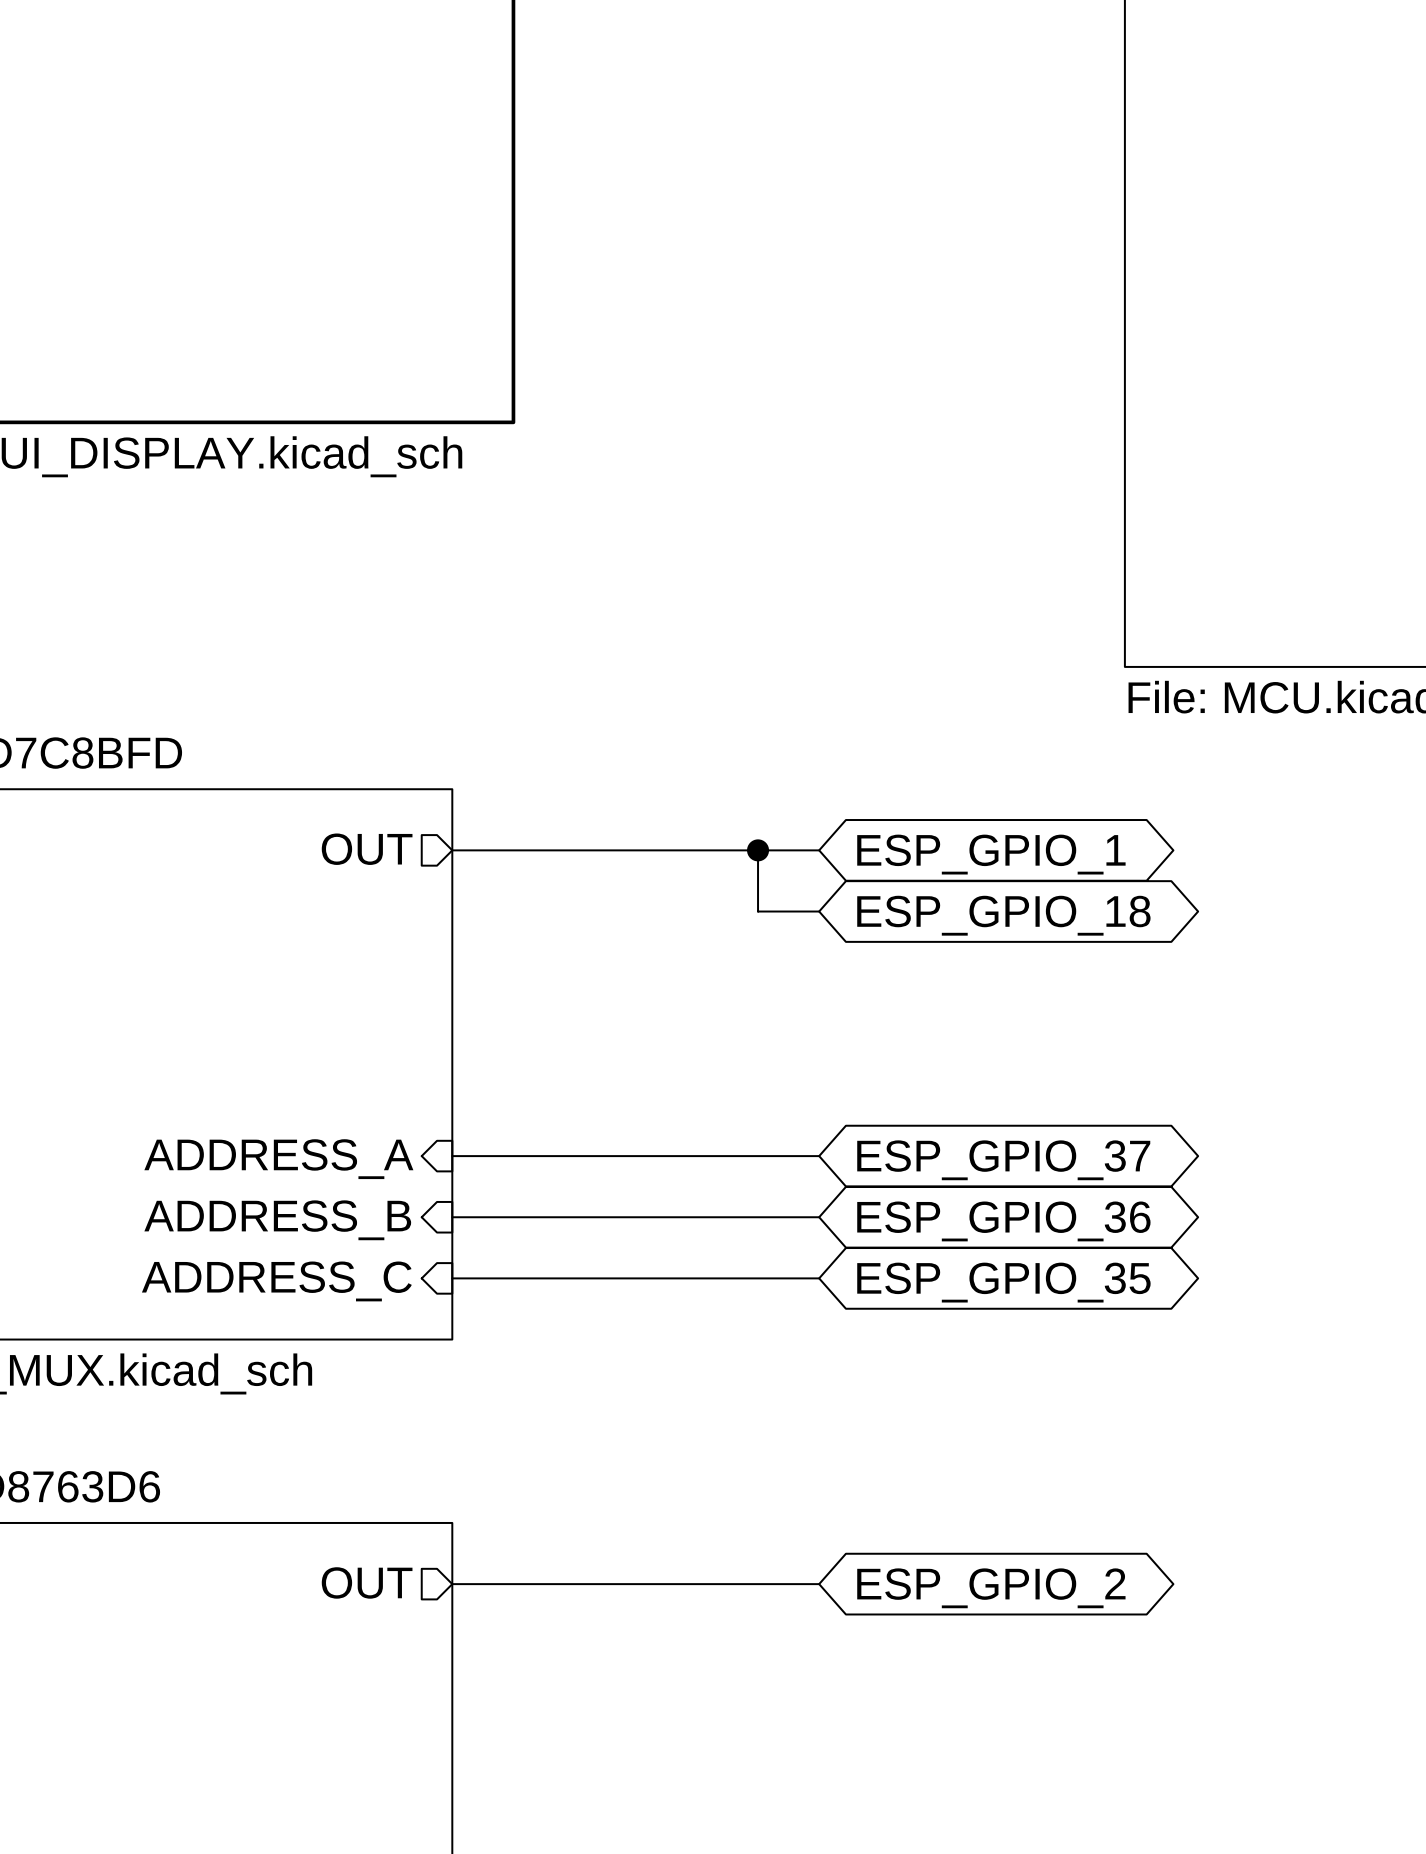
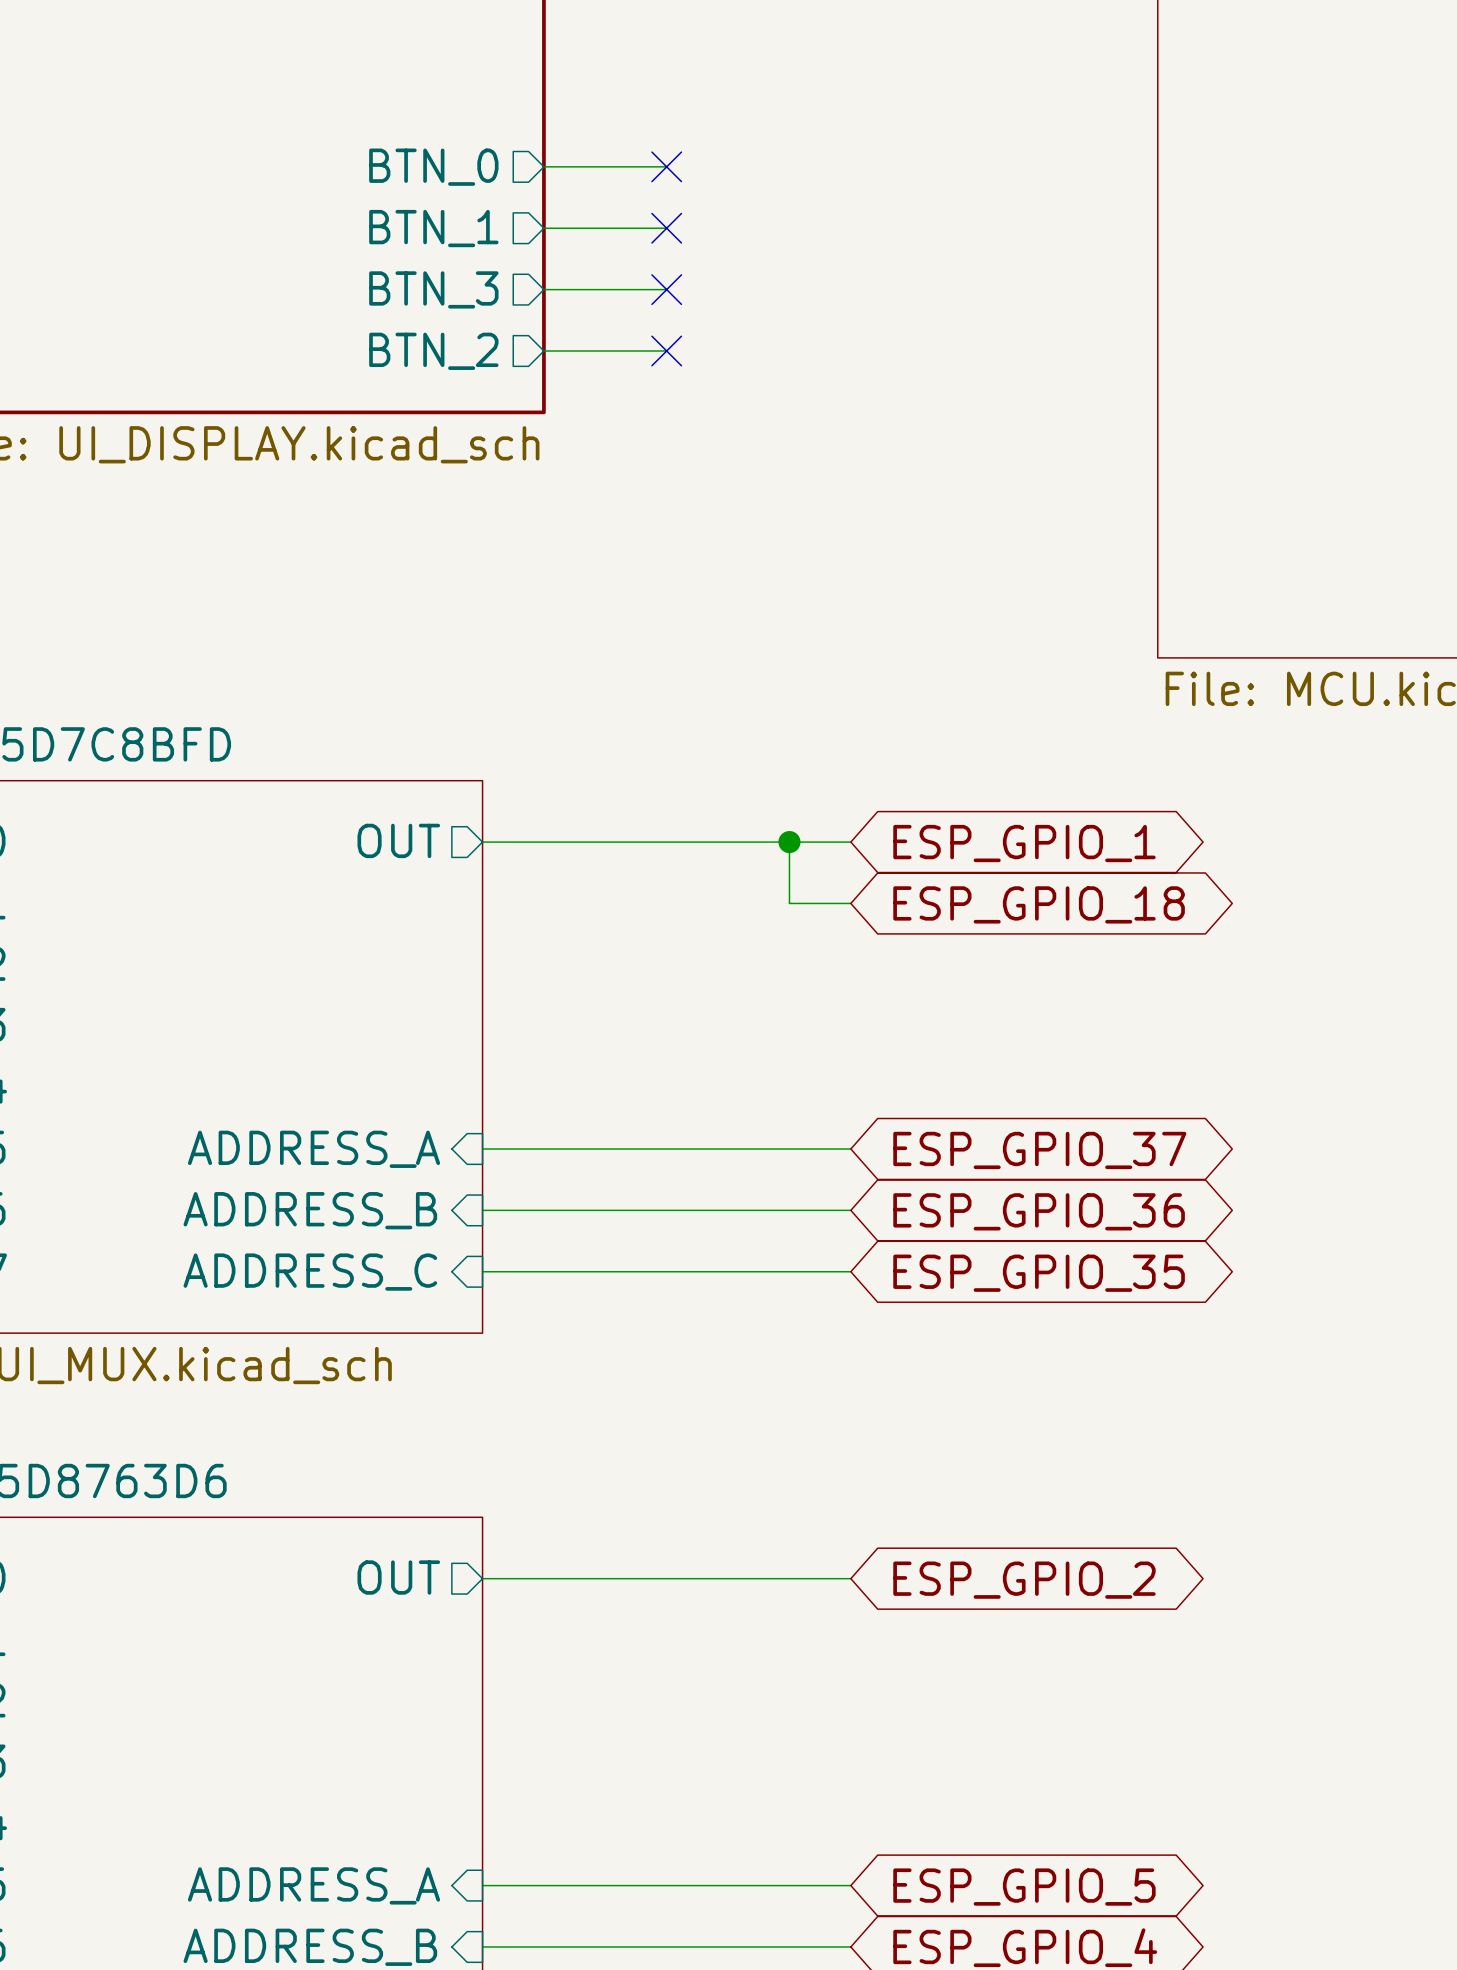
wire: none -> (543, 166) (666, 166)
no-connect mark: none -> (666, 166)
sheet pin: none -> BTN_0 (433, 167)
wire: none -> (543, 228) (666, 228)
no-connect mark: none -> (666, 228)
sheet pin: none -> BTN_1 (433, 228)
wire: none -> (543, 289) (666, 289)
no-connect mark: none -> (666, 289)
sheet pin: none -> BTN_3 (433, 289)
wire: none -> (543, 351) (666, 351)
no-connect mark: none -> (666, 351)
sheet pin: none -> BTN_2 (433, 351)

